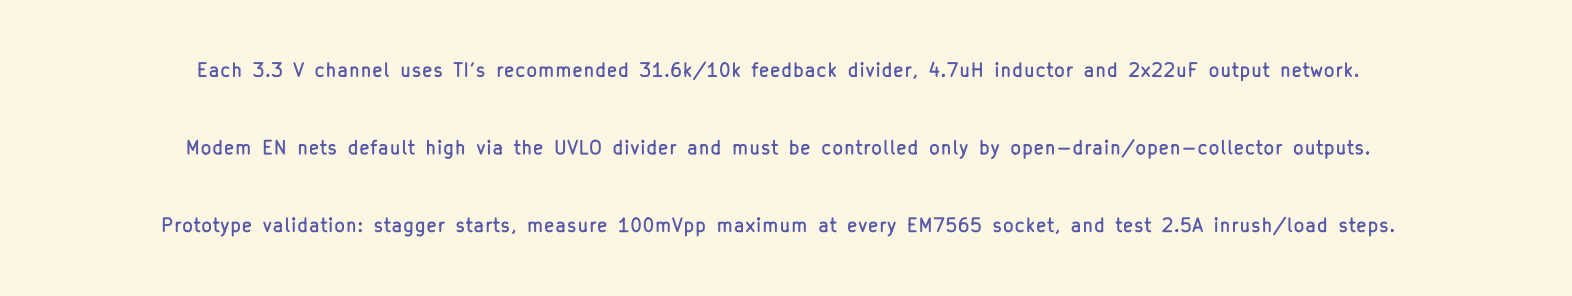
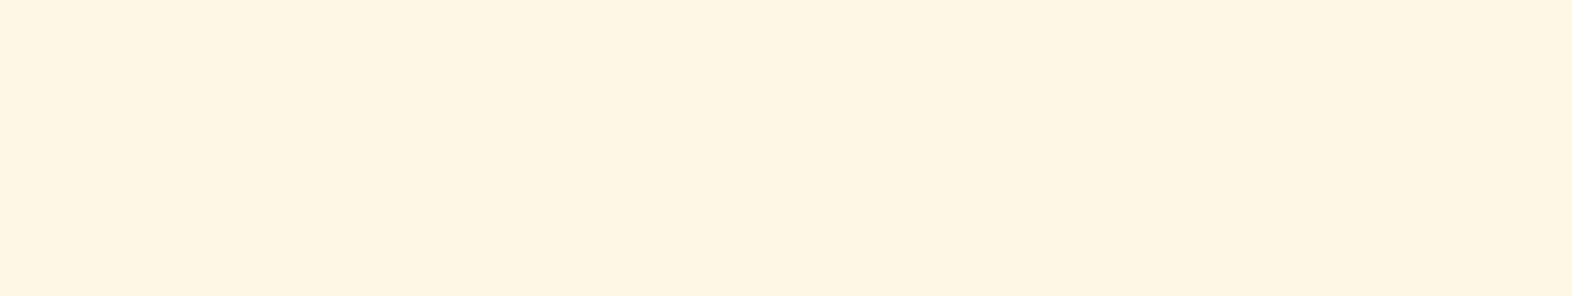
text: Each 3.3 V channel uses TI's recommended 31.6k/10k feedback divider, 4.7uH inductor and 2x22uF output network. (778, 71) -> none
text: Modem EN nets default high via the UVLO divider and must be controlled only by open-drain/open-collector outputs. (778, 149) -> none
text: Prototype validation: stagger starts, measure 100mVpp maximum at every EM7565 socket, and test 2.5A inrush/load steps. (778, 226) -> none

